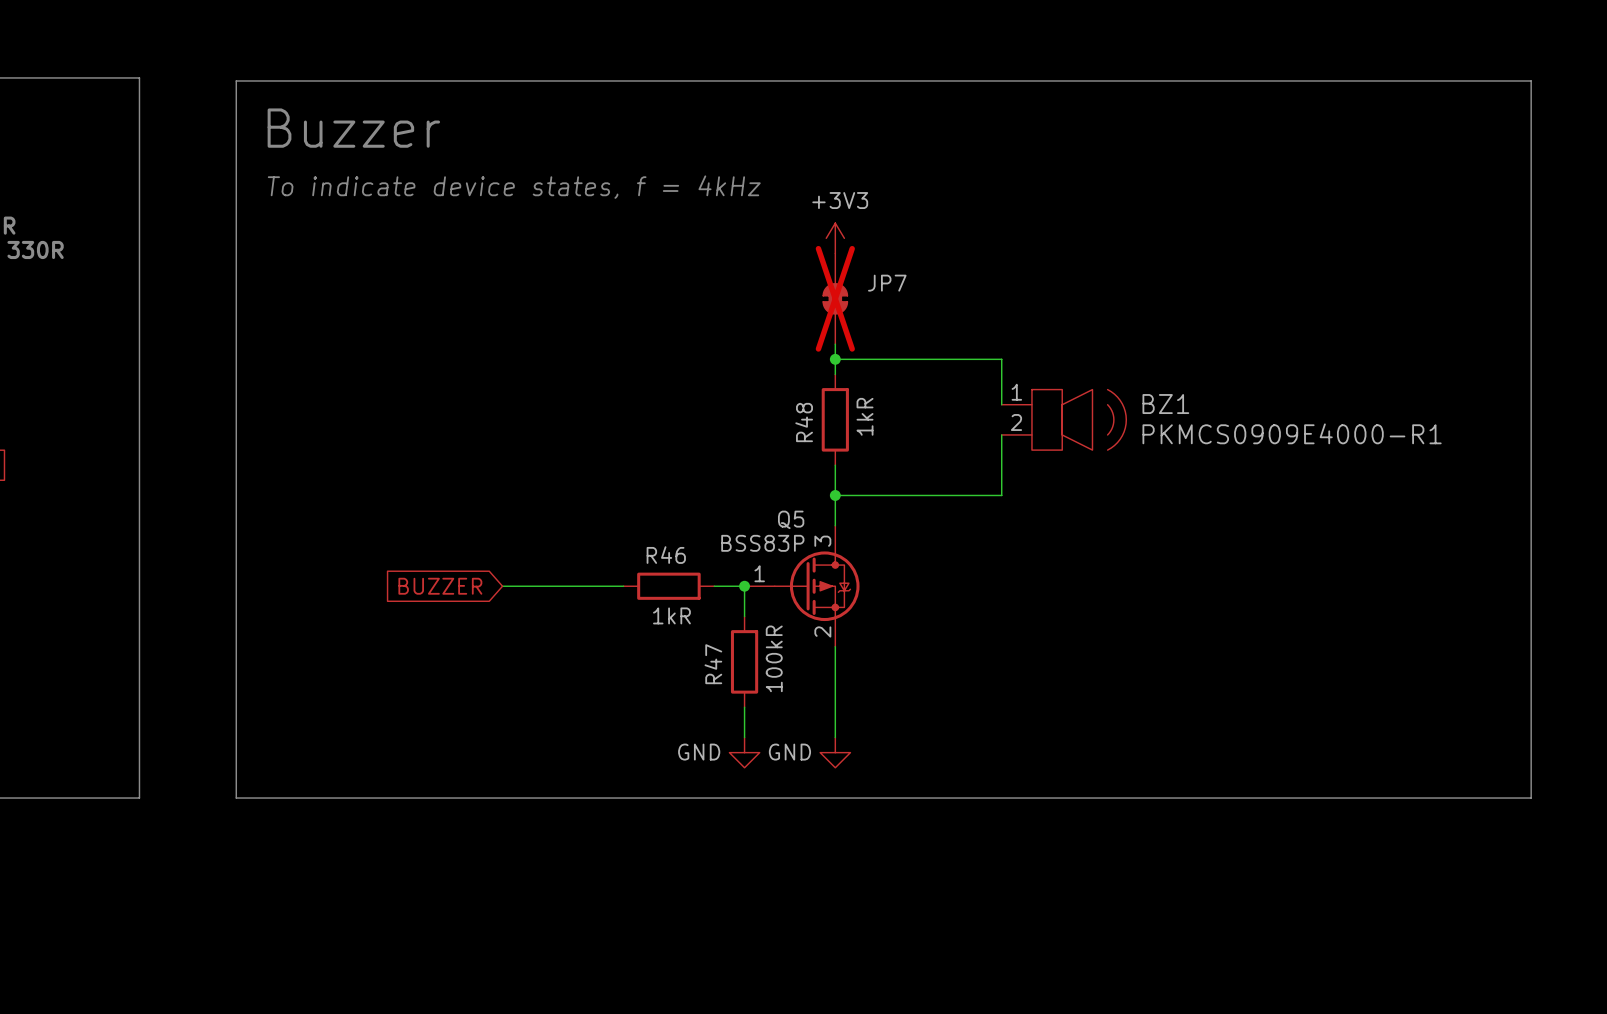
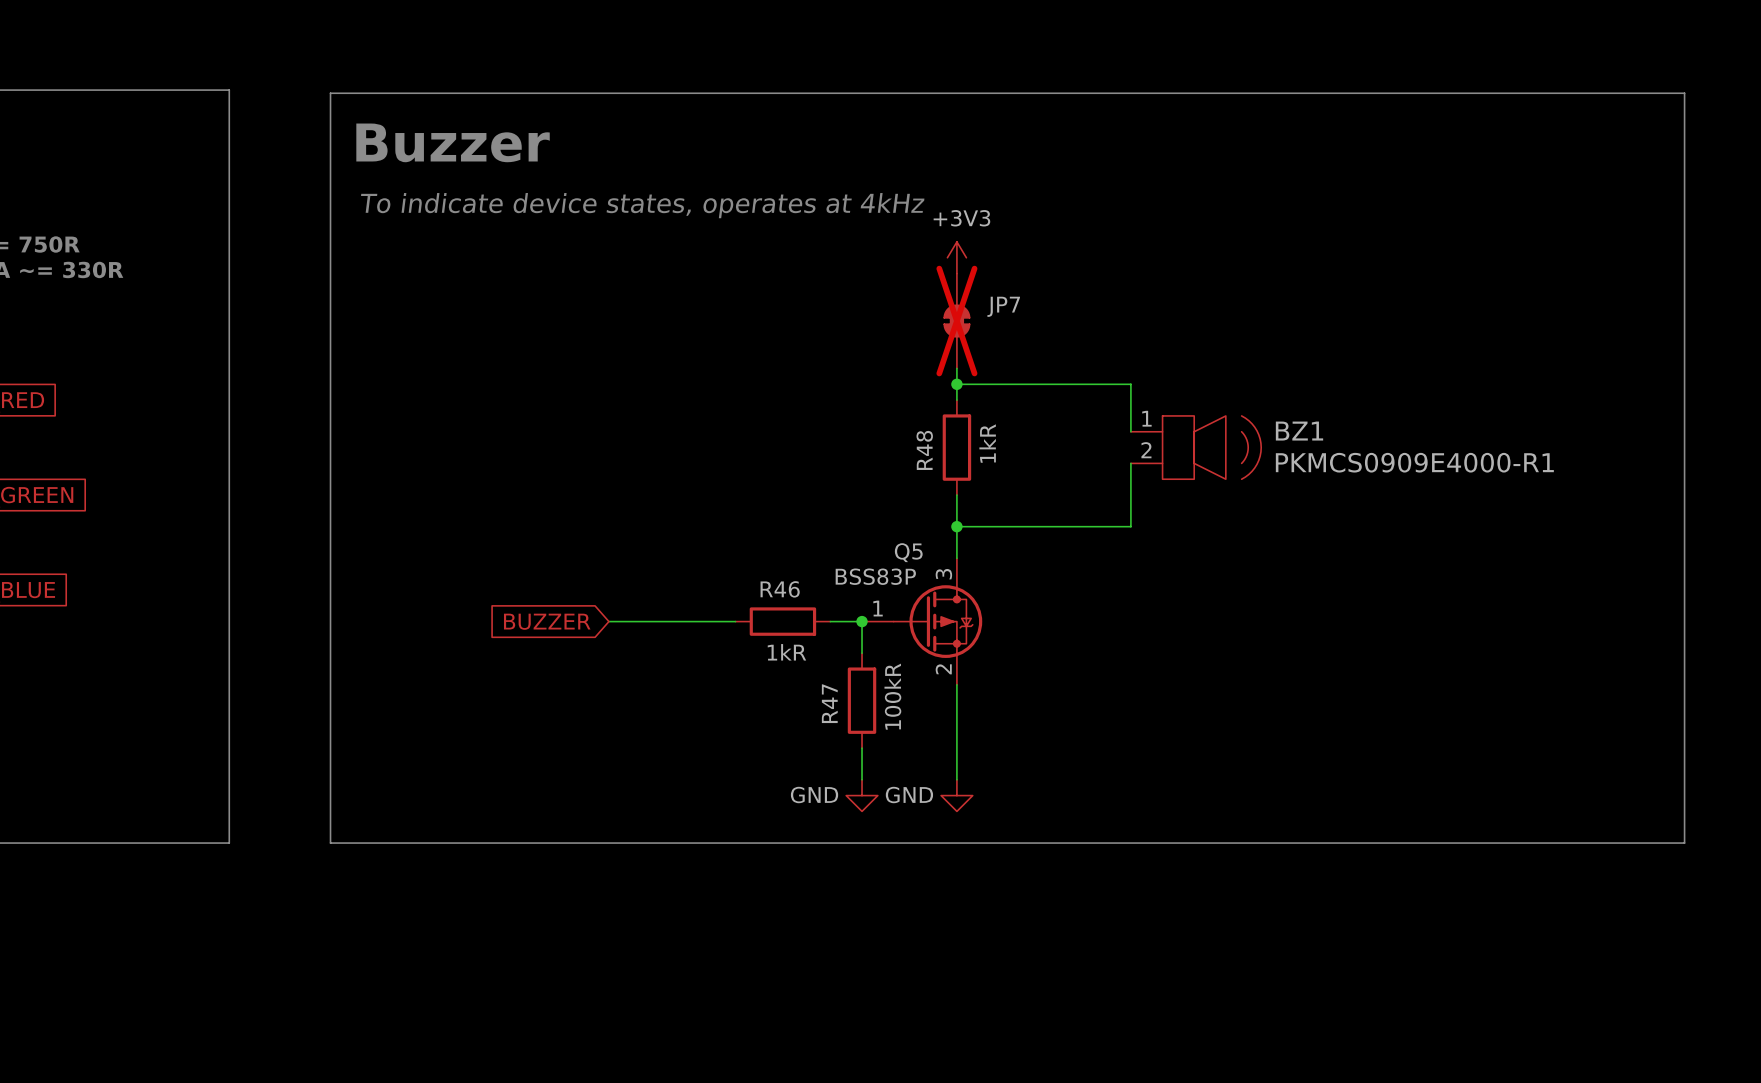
text: To indicate device states, f = 4kHz (514, 187) -> To indicate device states, operates at 4kHz (642, 205)

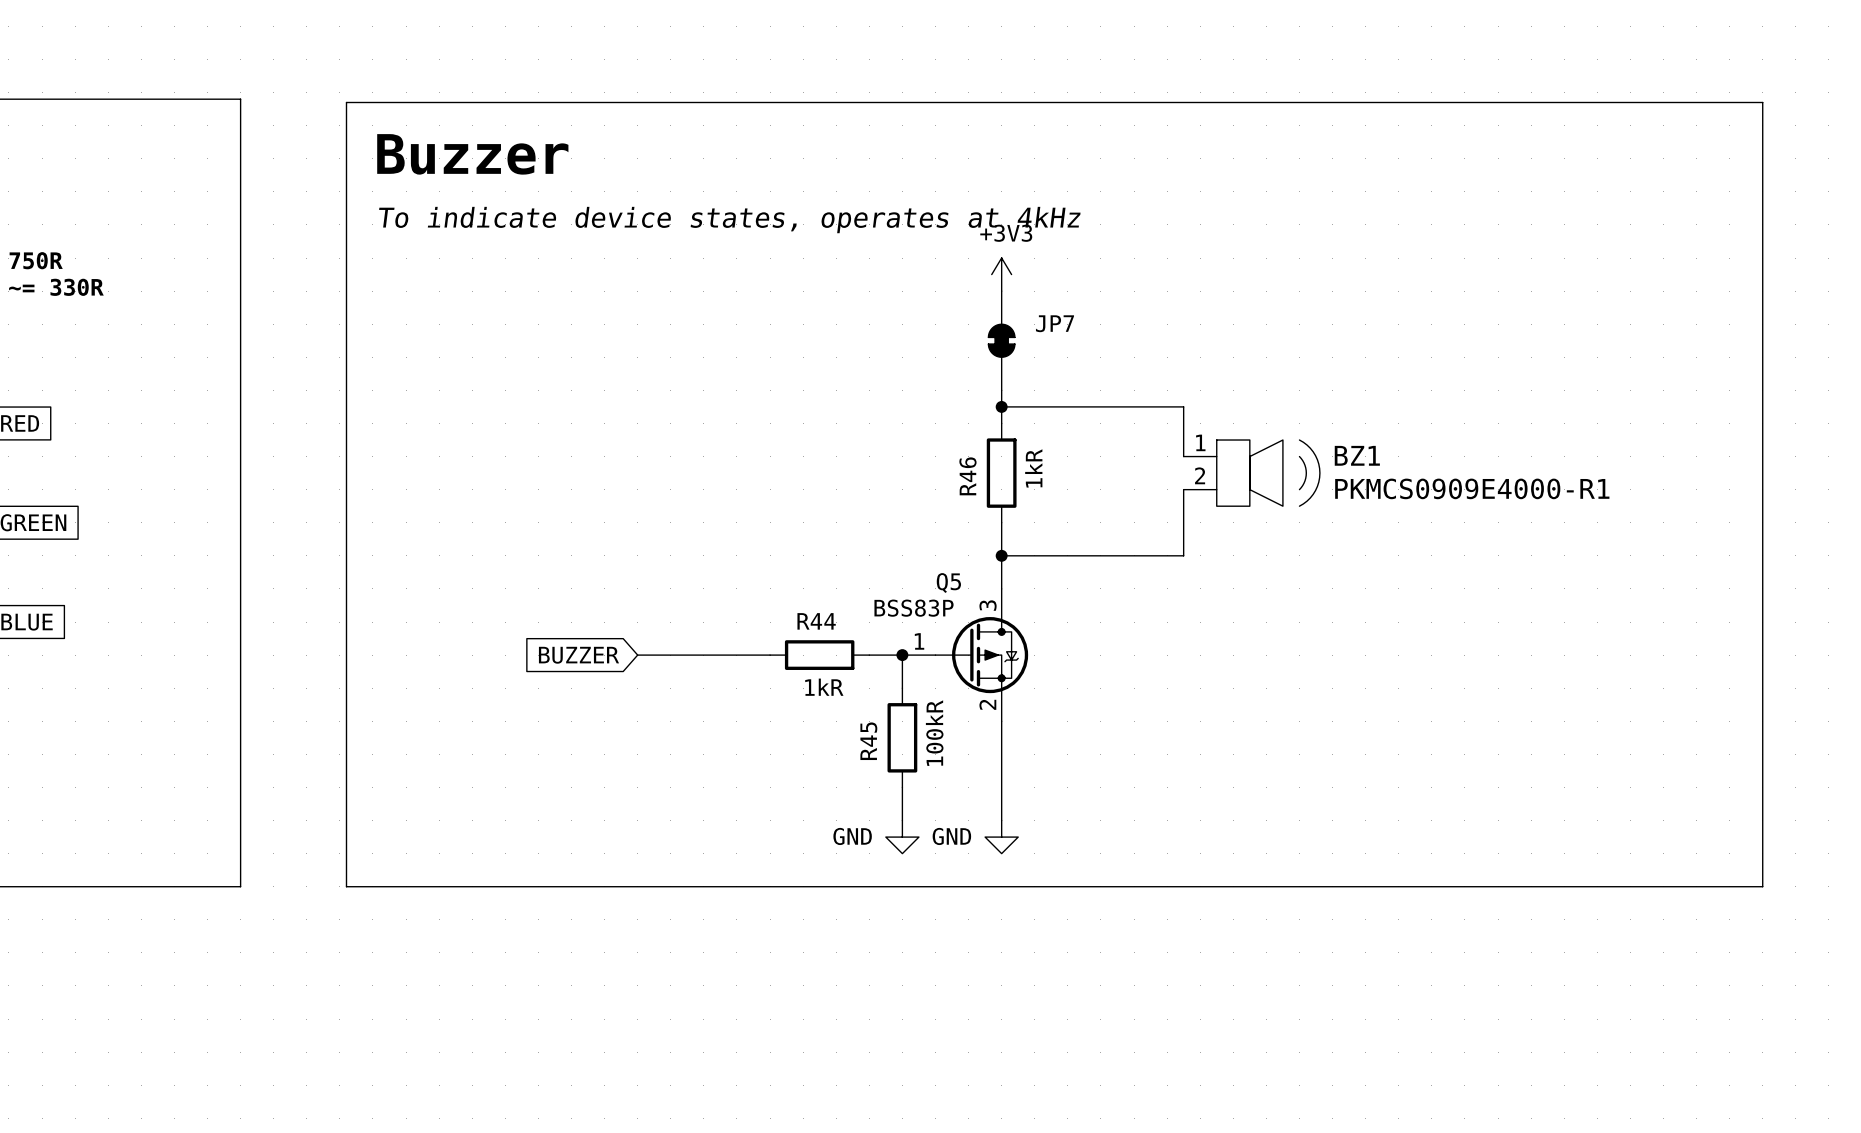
JP7 do-not-place cross: (956, 321) -> none
R48 name: R48 (924, 450) -> R46 (967, 476)
R46 name: R46 (780, 589) -> R44 (816, 621)
R47 name: R47 (829, 703) -> R45 (868, 741)

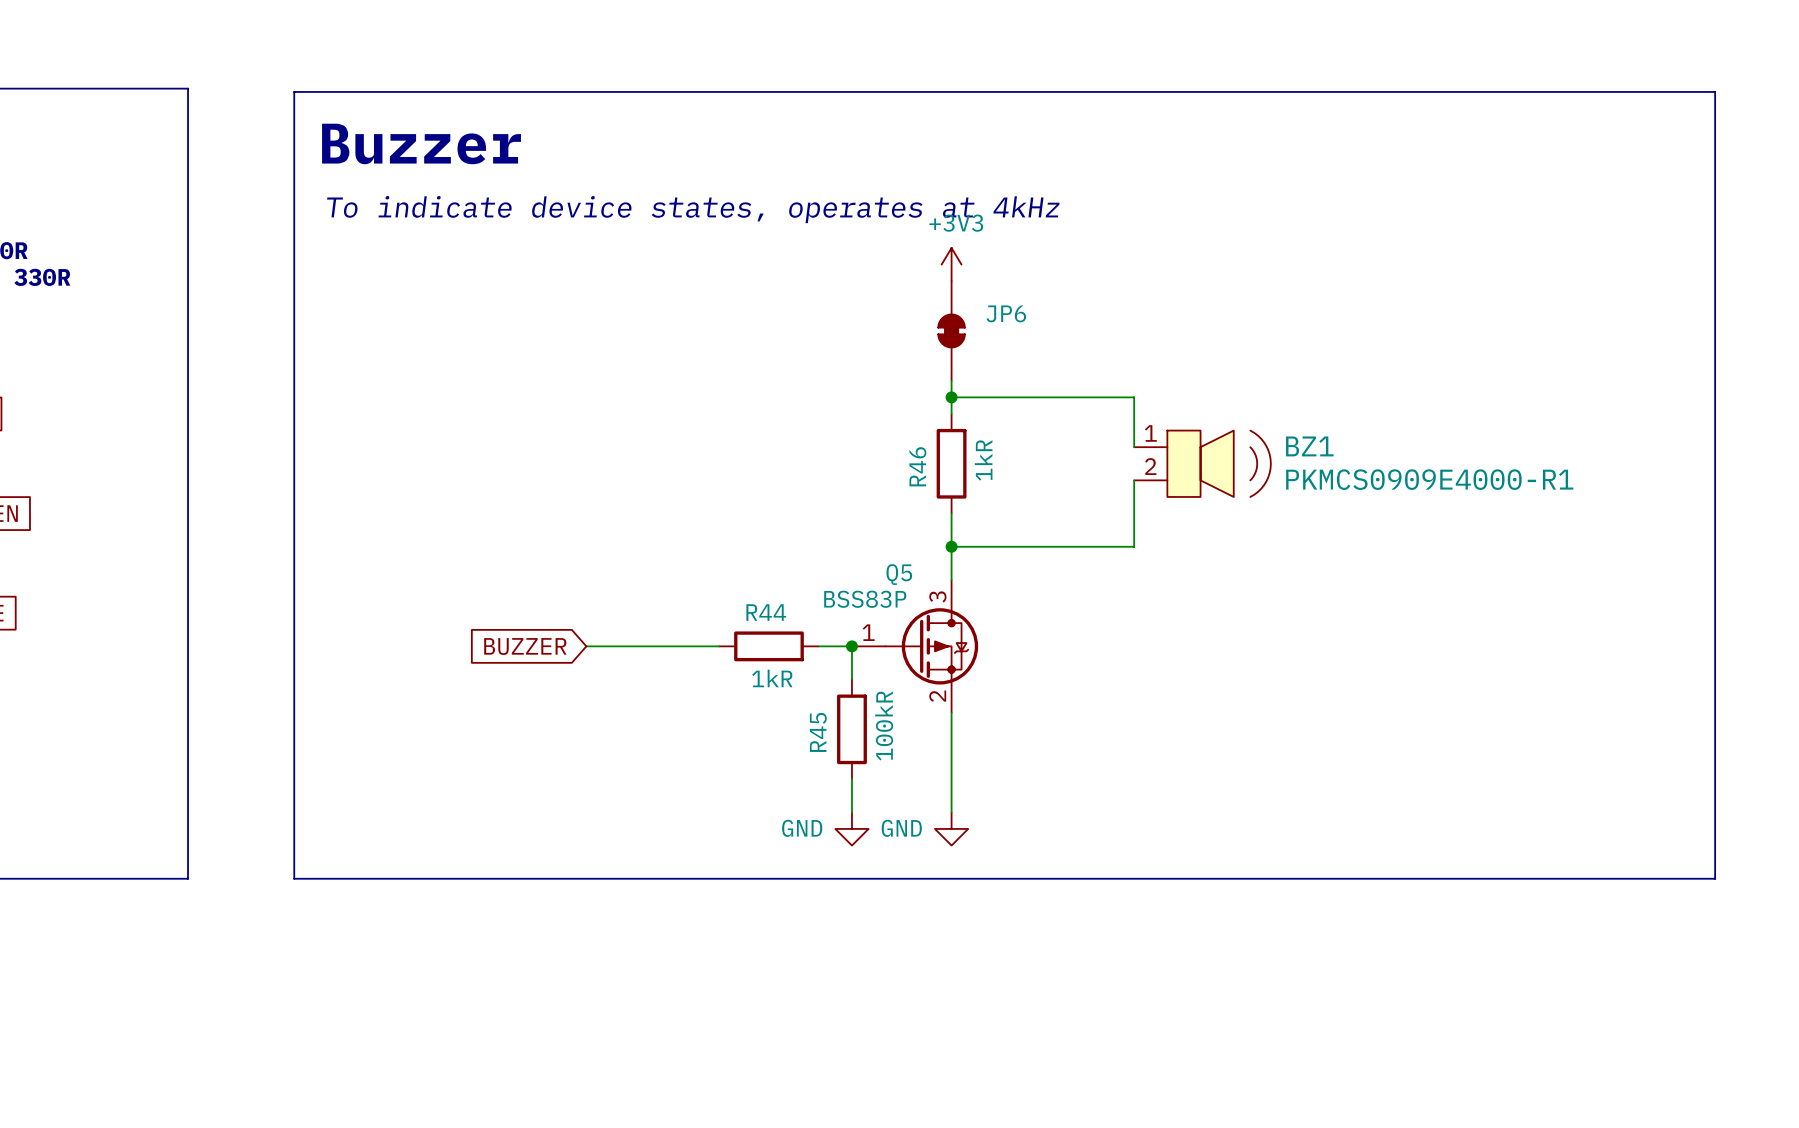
JP7 name: JP7 (1055, 323) -> JP6 (1006, 313)

